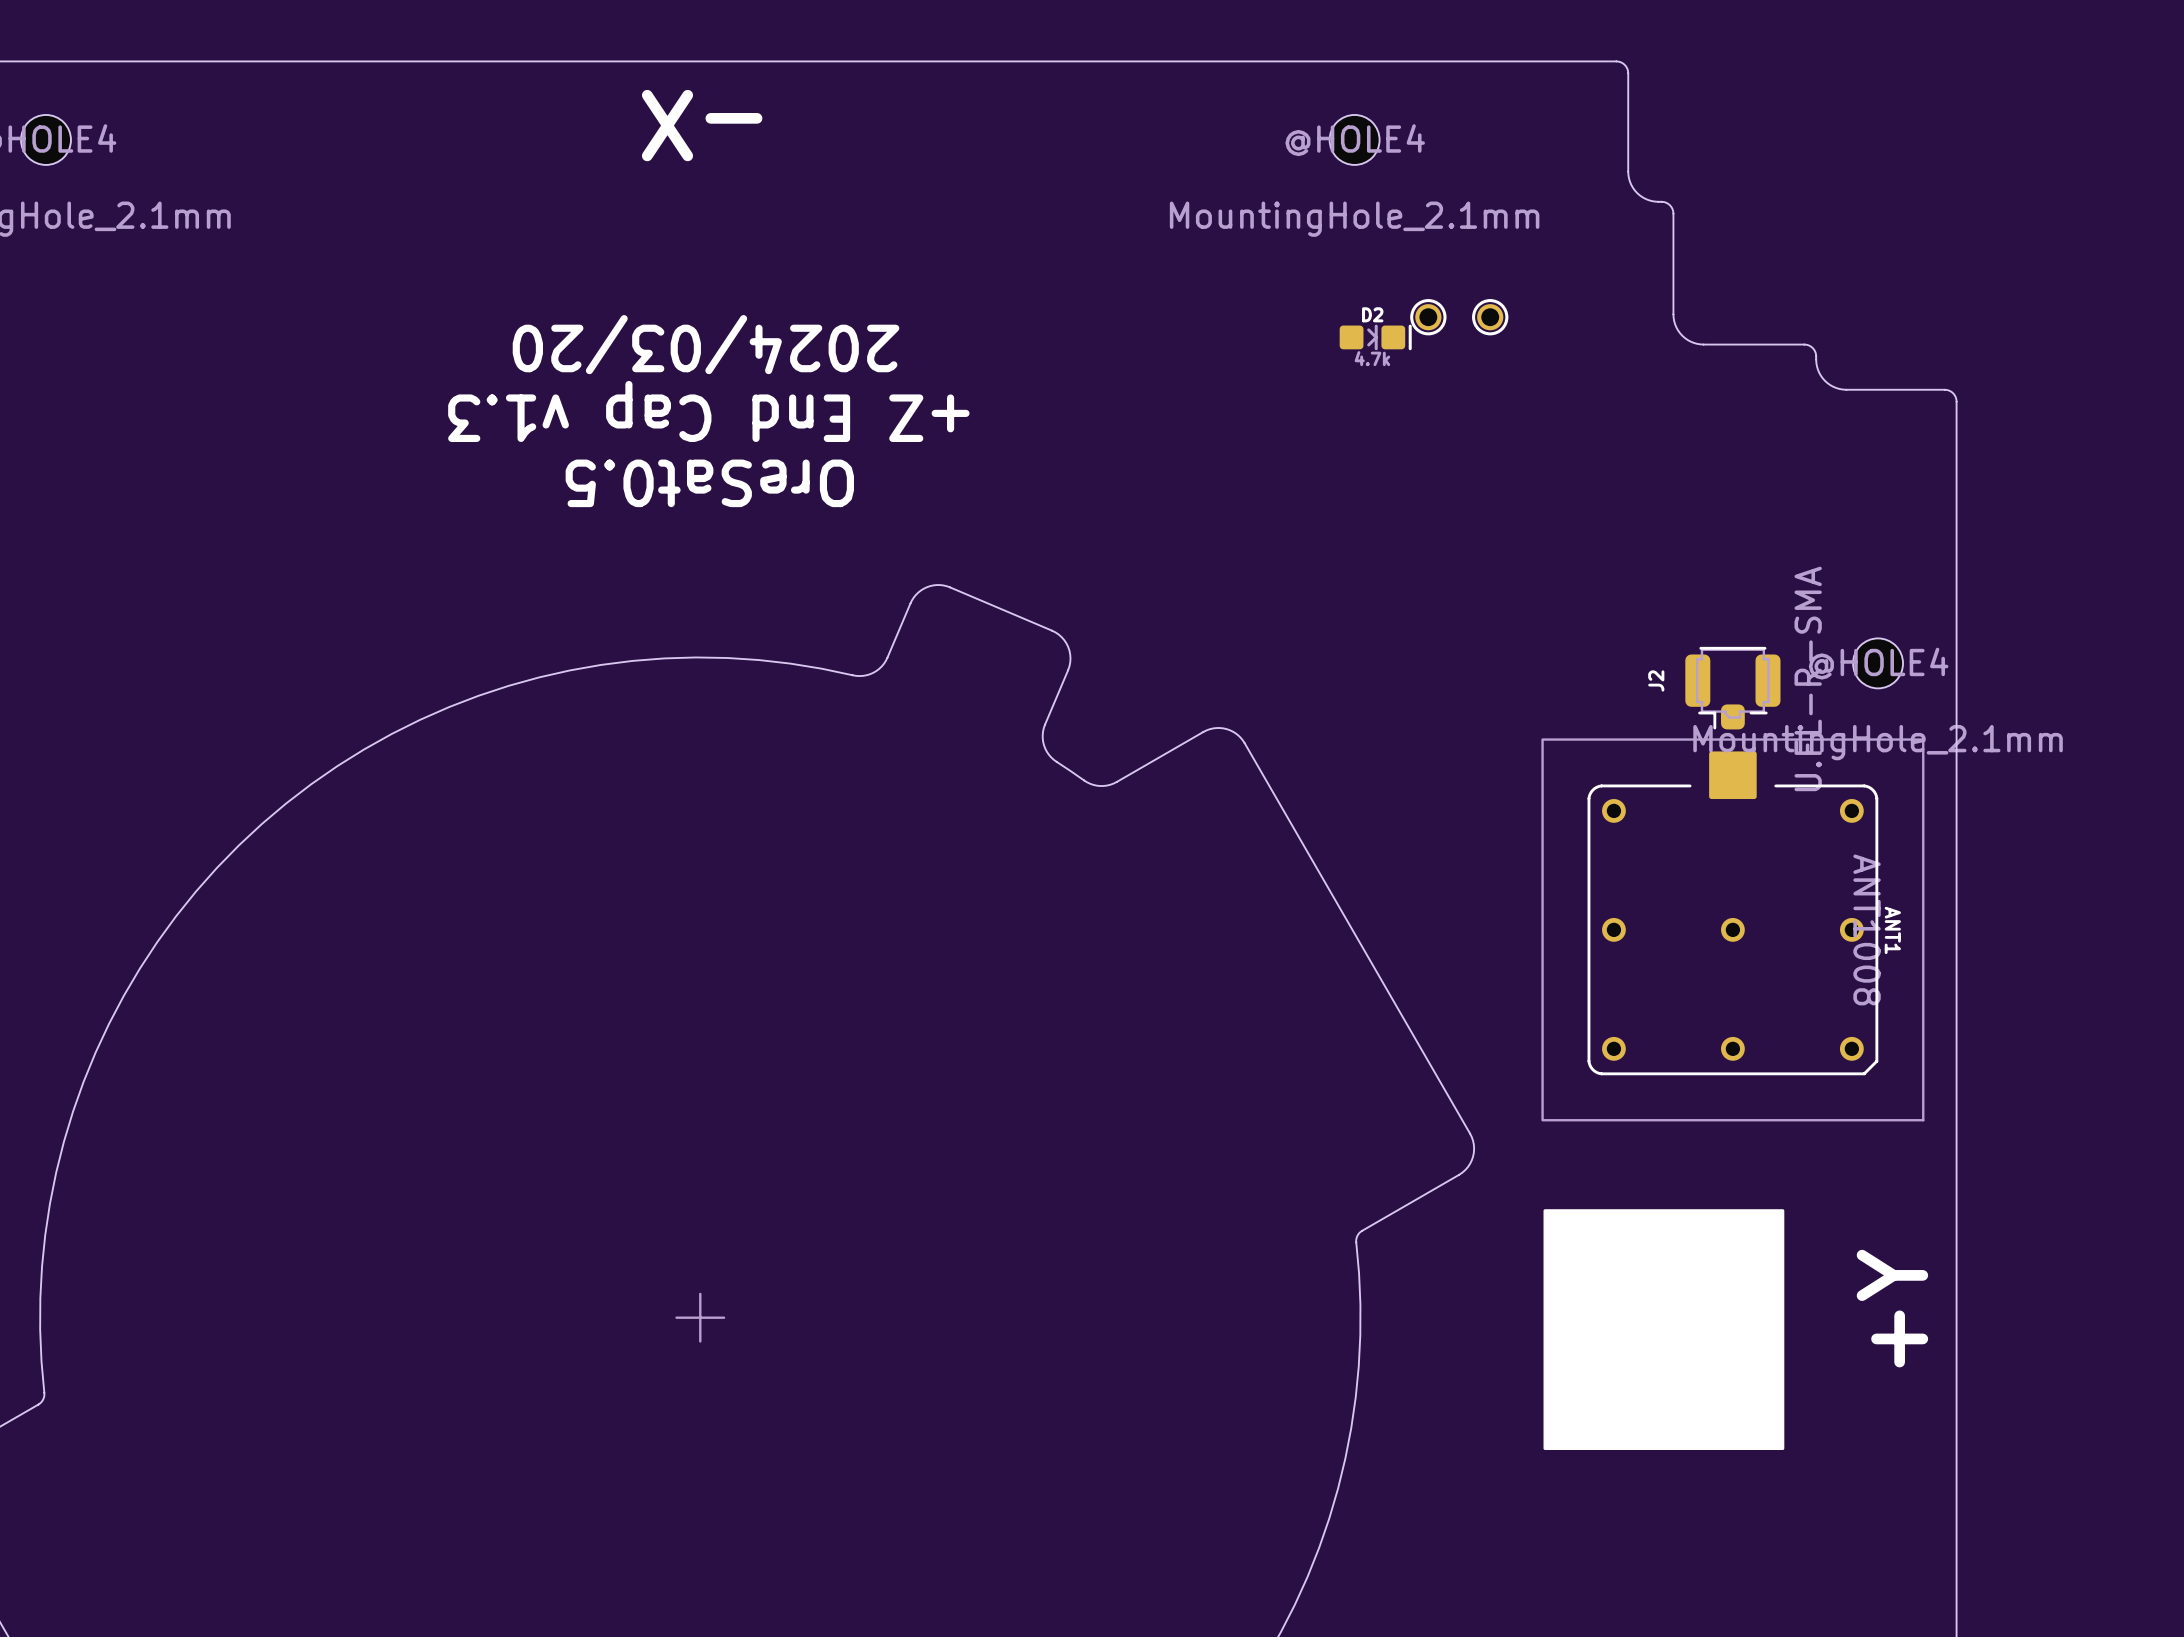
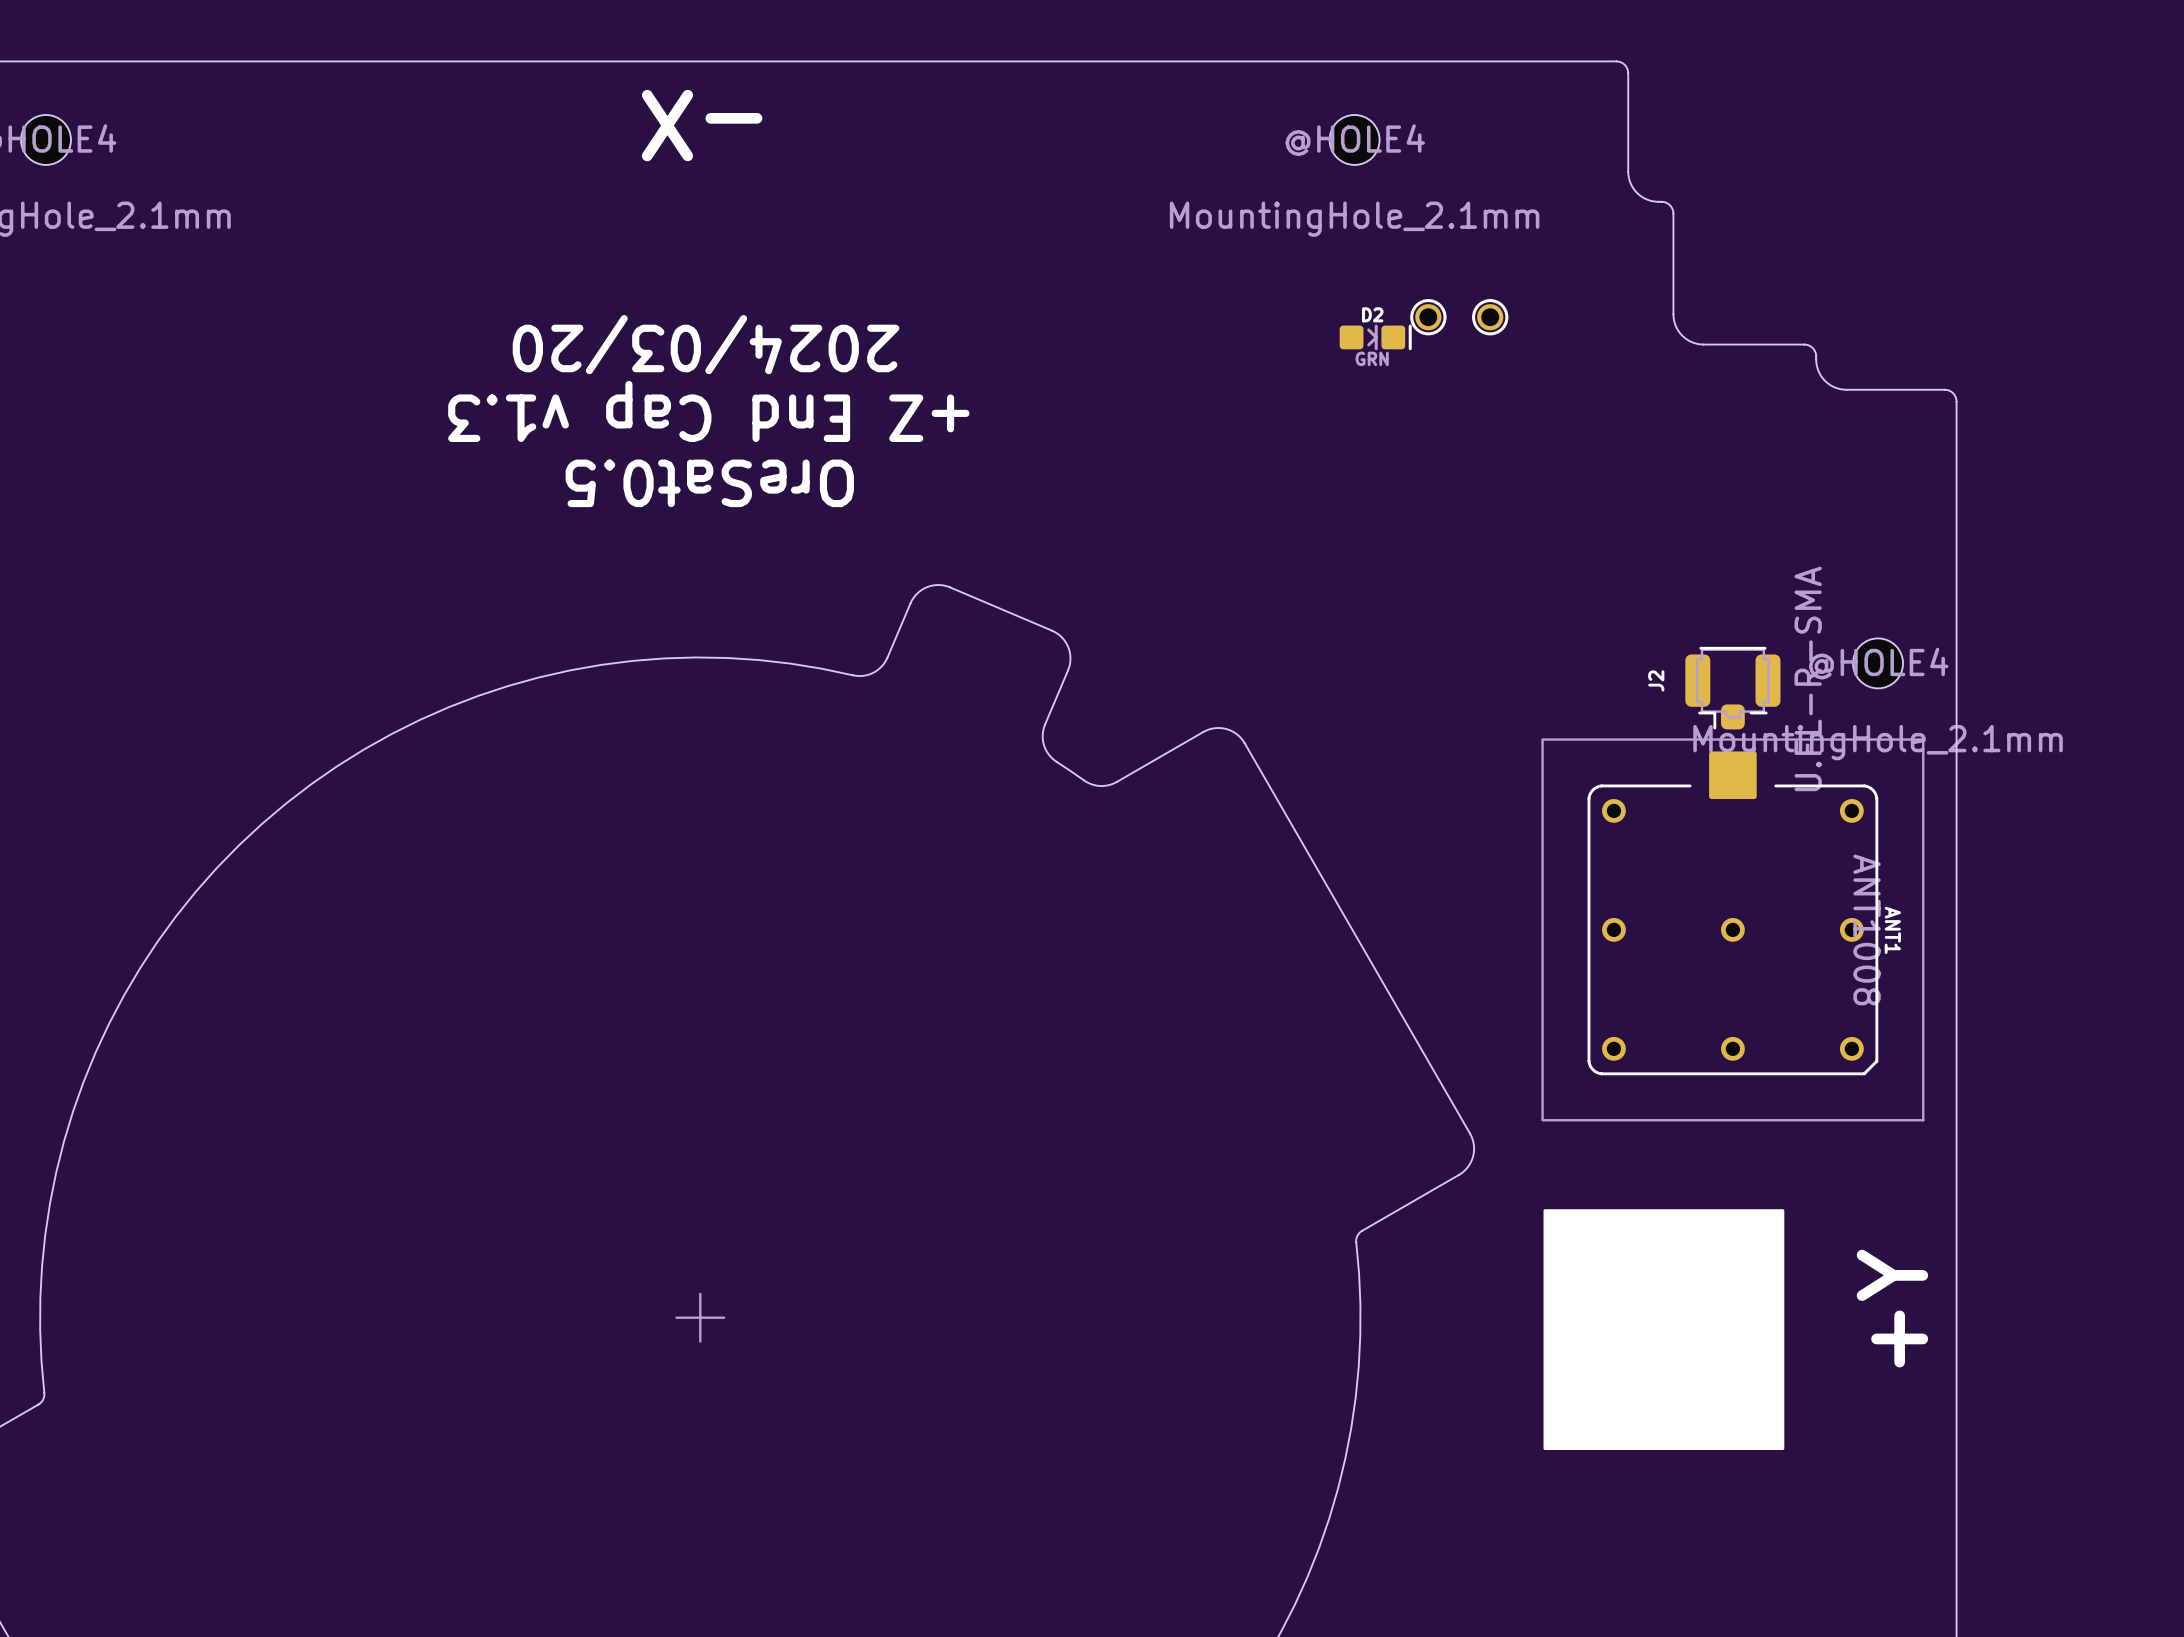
D2 value: 4.7k (1372, 358) -> GRN (1372, 358)

